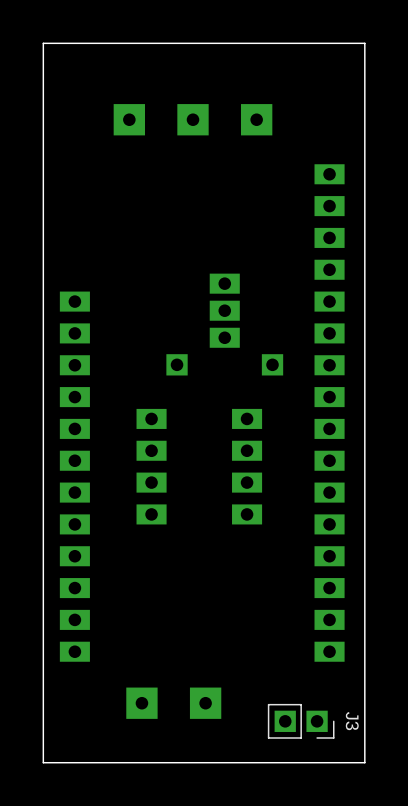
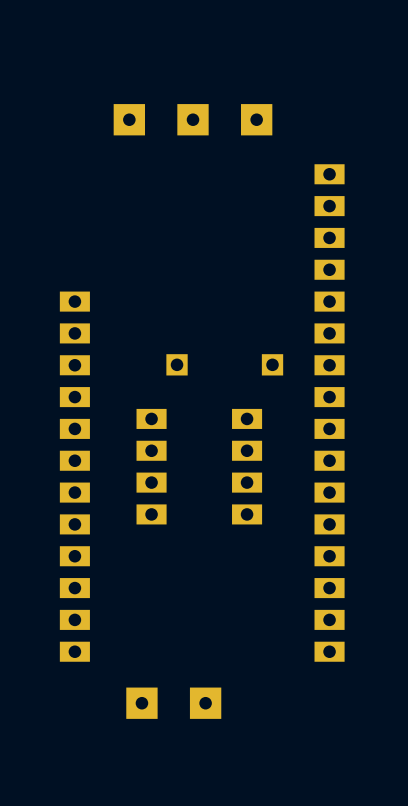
board edge: (364, 43) (364, 762) (43, 762) (43, 43) (364, 43) -> none
part: (224, 310) -> none
J3: (301, 721) -> none

